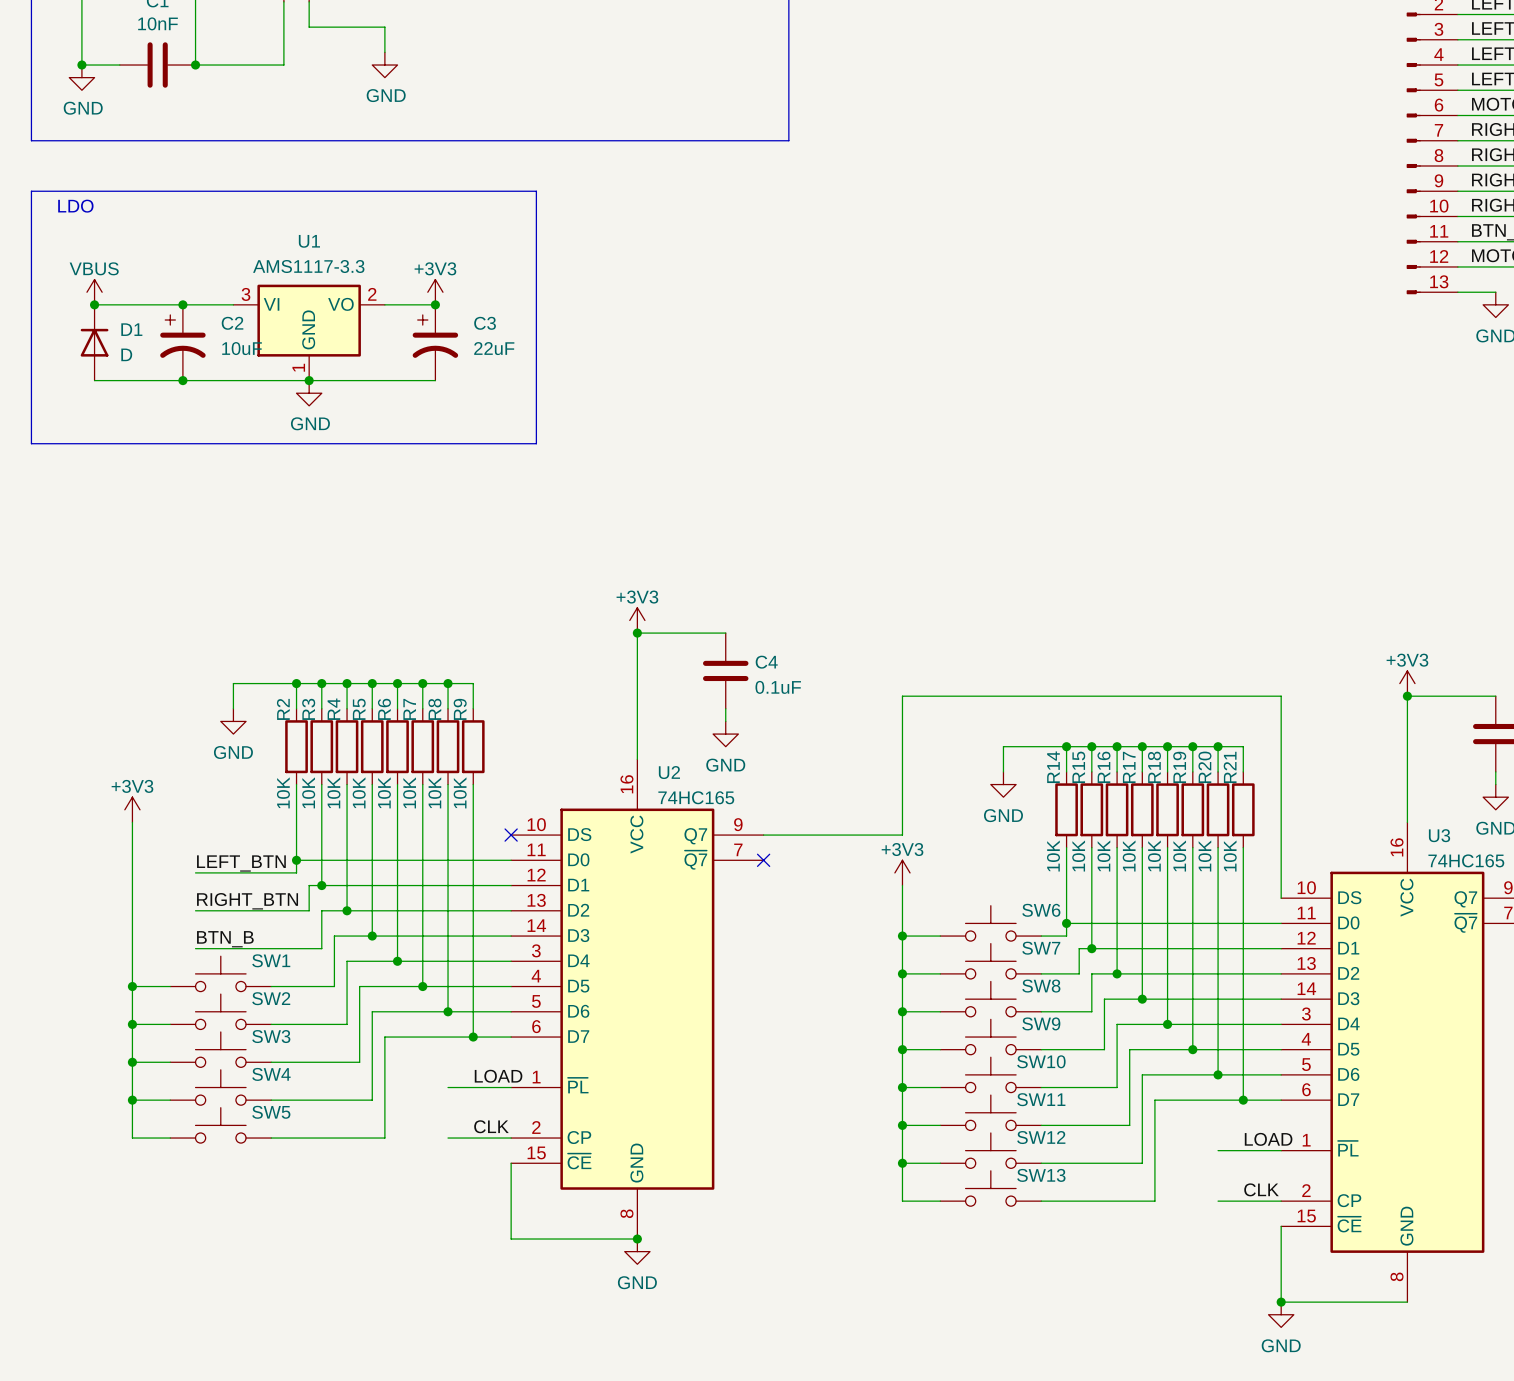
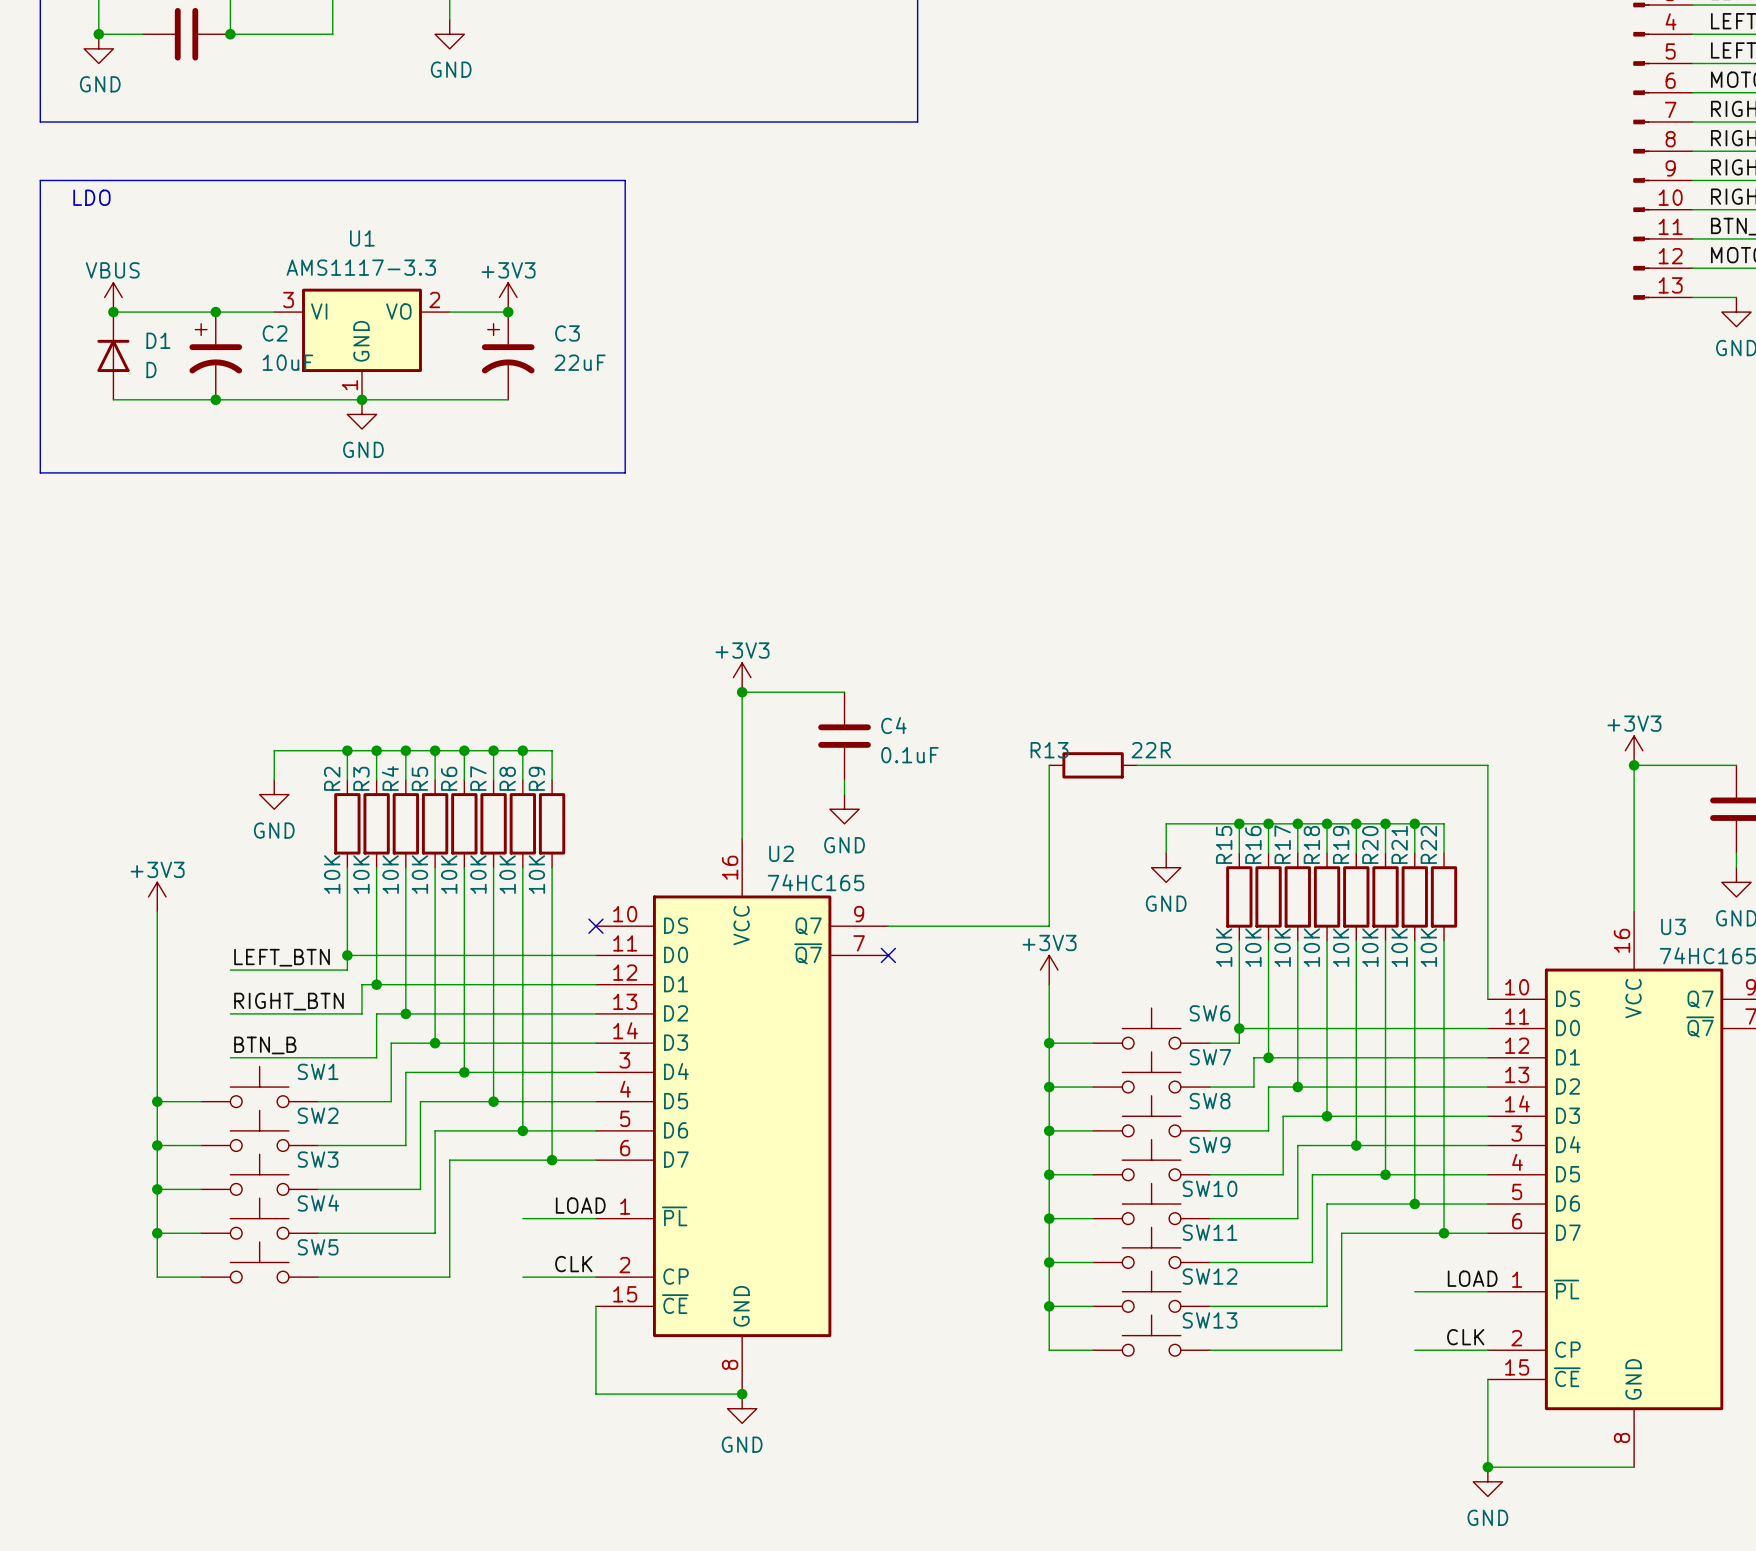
wire: (902, 696) (978, 696) -> none
R13: none -> 22R (1093, 765)
R14 name: R14 (1053, 767) -> R15 (1224, 844)
R15 name: R15 (1078, 767) -> R16 (1253, 844)
R16 name: R16 (1103, 767) -> R17 (1282, 844)
R17 name: R17 (1129, 767) -> R18 (1311, 844)
R18 name: R18 (1154, 767) -> R19 (1341, 844)
R19 name: R19 (1179, 767) -> R20 (1370, 844)
R20 name: R20 (1204, 767) -> R21 (1399, 844)
R21 name: R21 (1230, 767) -> R22 (1428, 844)

